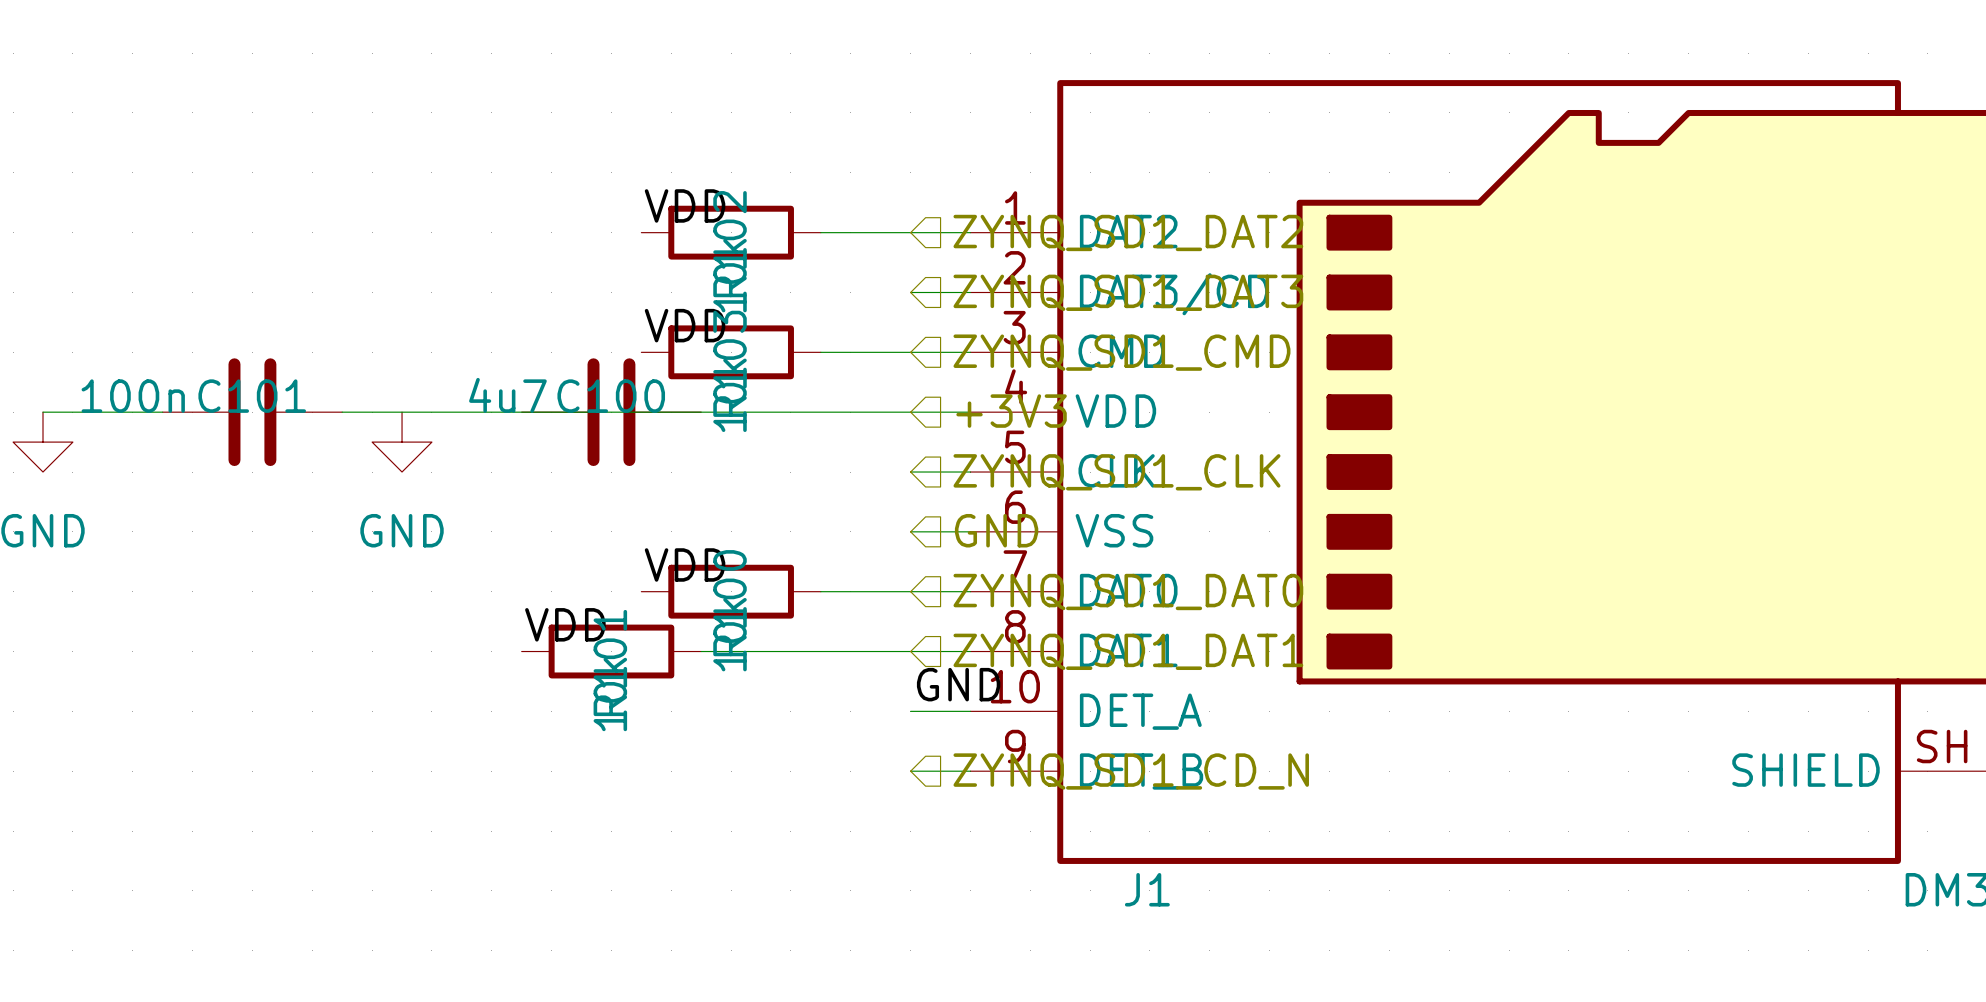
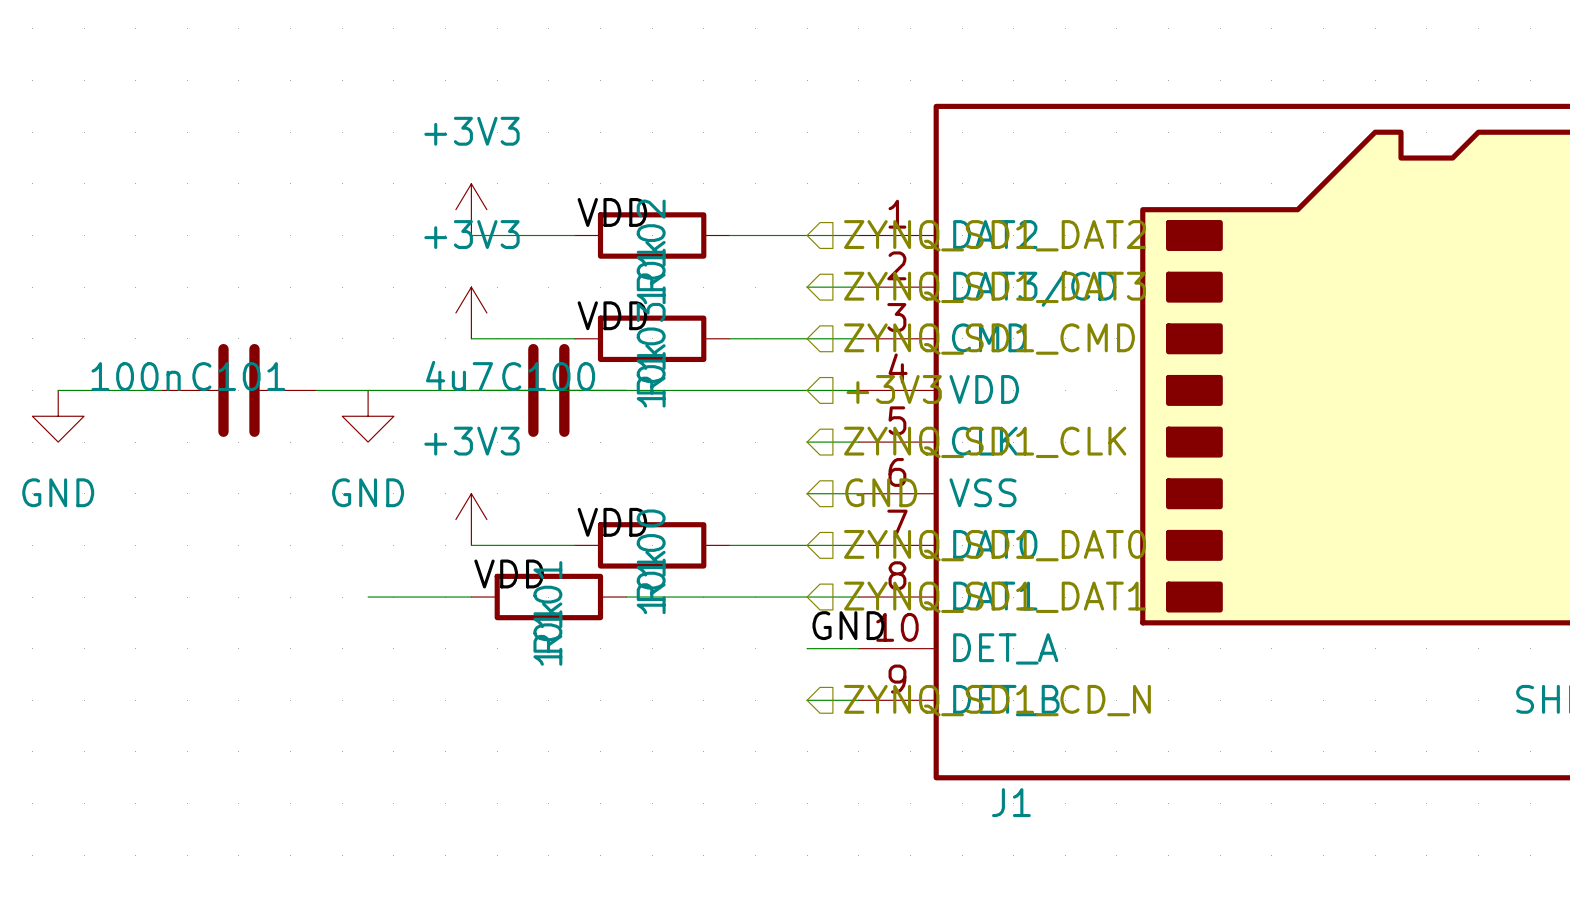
power symbol: none -> +3V3 (471, 209)
wire: none -> (471, 235) (574, 235)
power symbol: none -> +3V3 (471, 312)
wire: none -> (471, 338) (574, 338)
power symbol: none -> +3V3 (471, 519)
wire: none -> (471, 545) (574, 545)
wire: none -> (368, 597) (471, 597)

